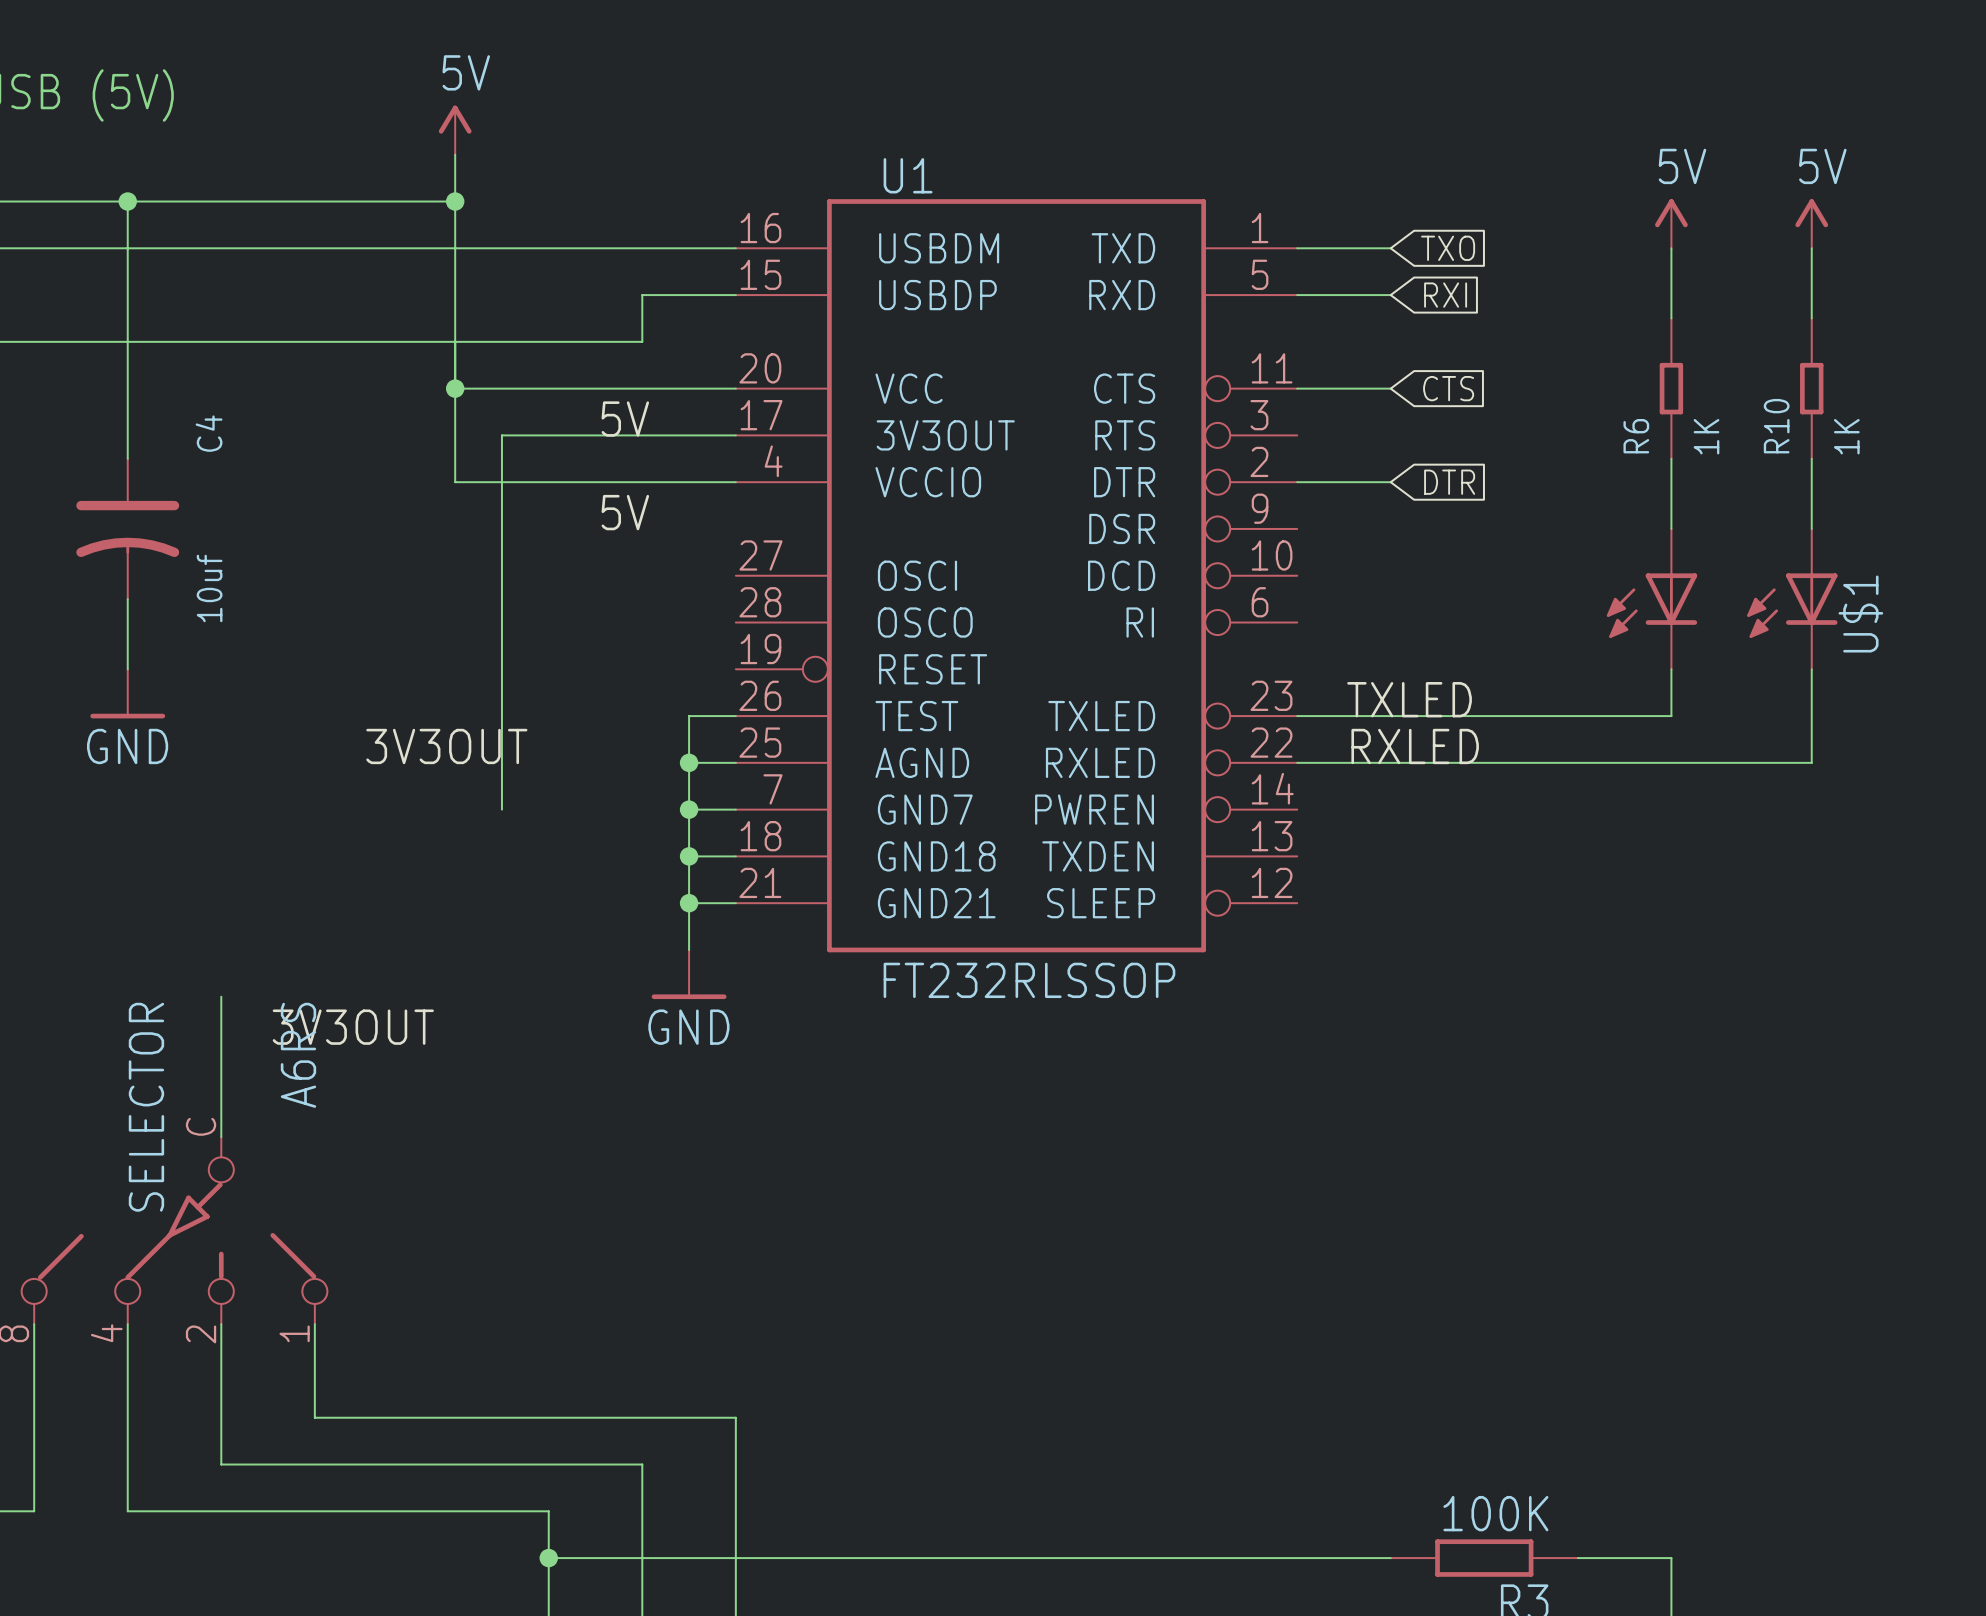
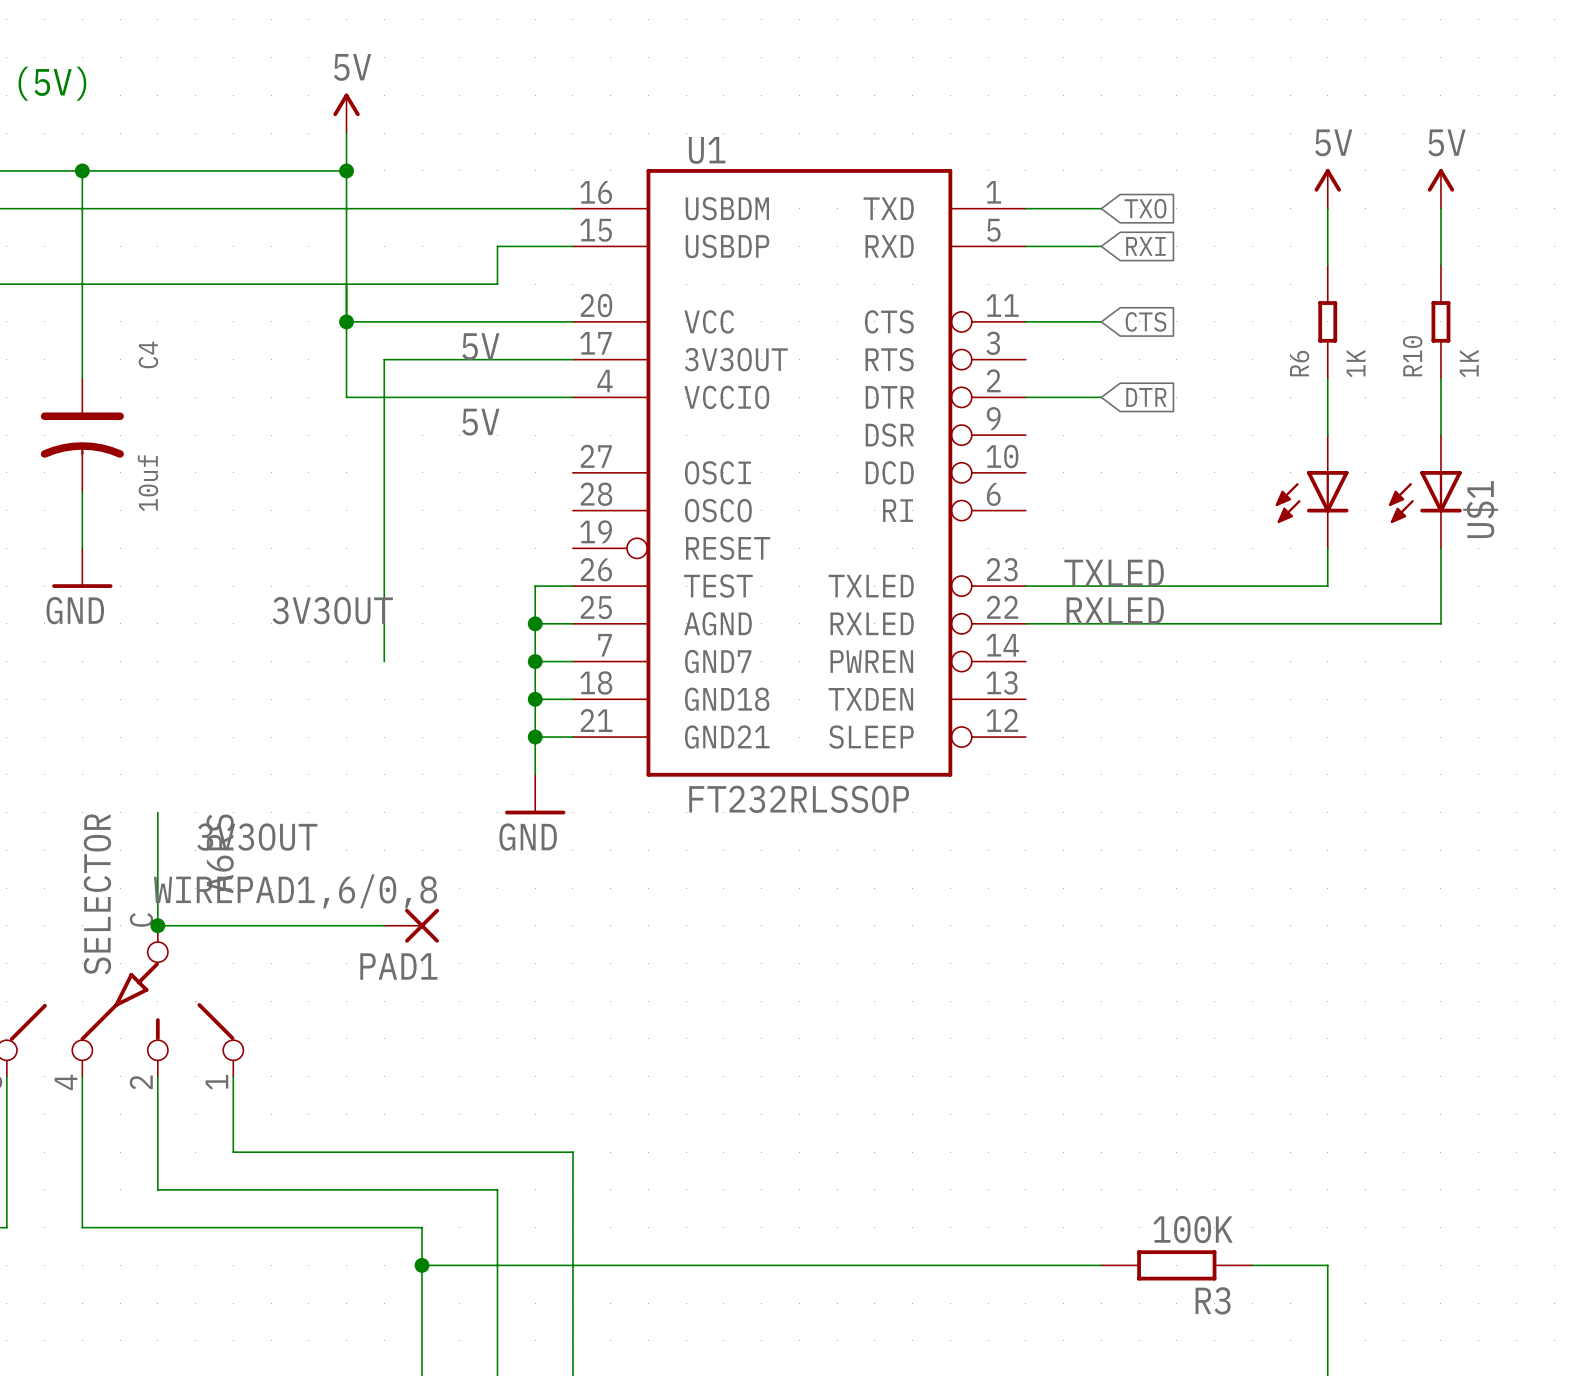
wire: none -> (157, 925) (384, 925)
junction: none -> (157, 925)
PAD1: none -> WIREPAD1,6/0,8 (411, 925)

